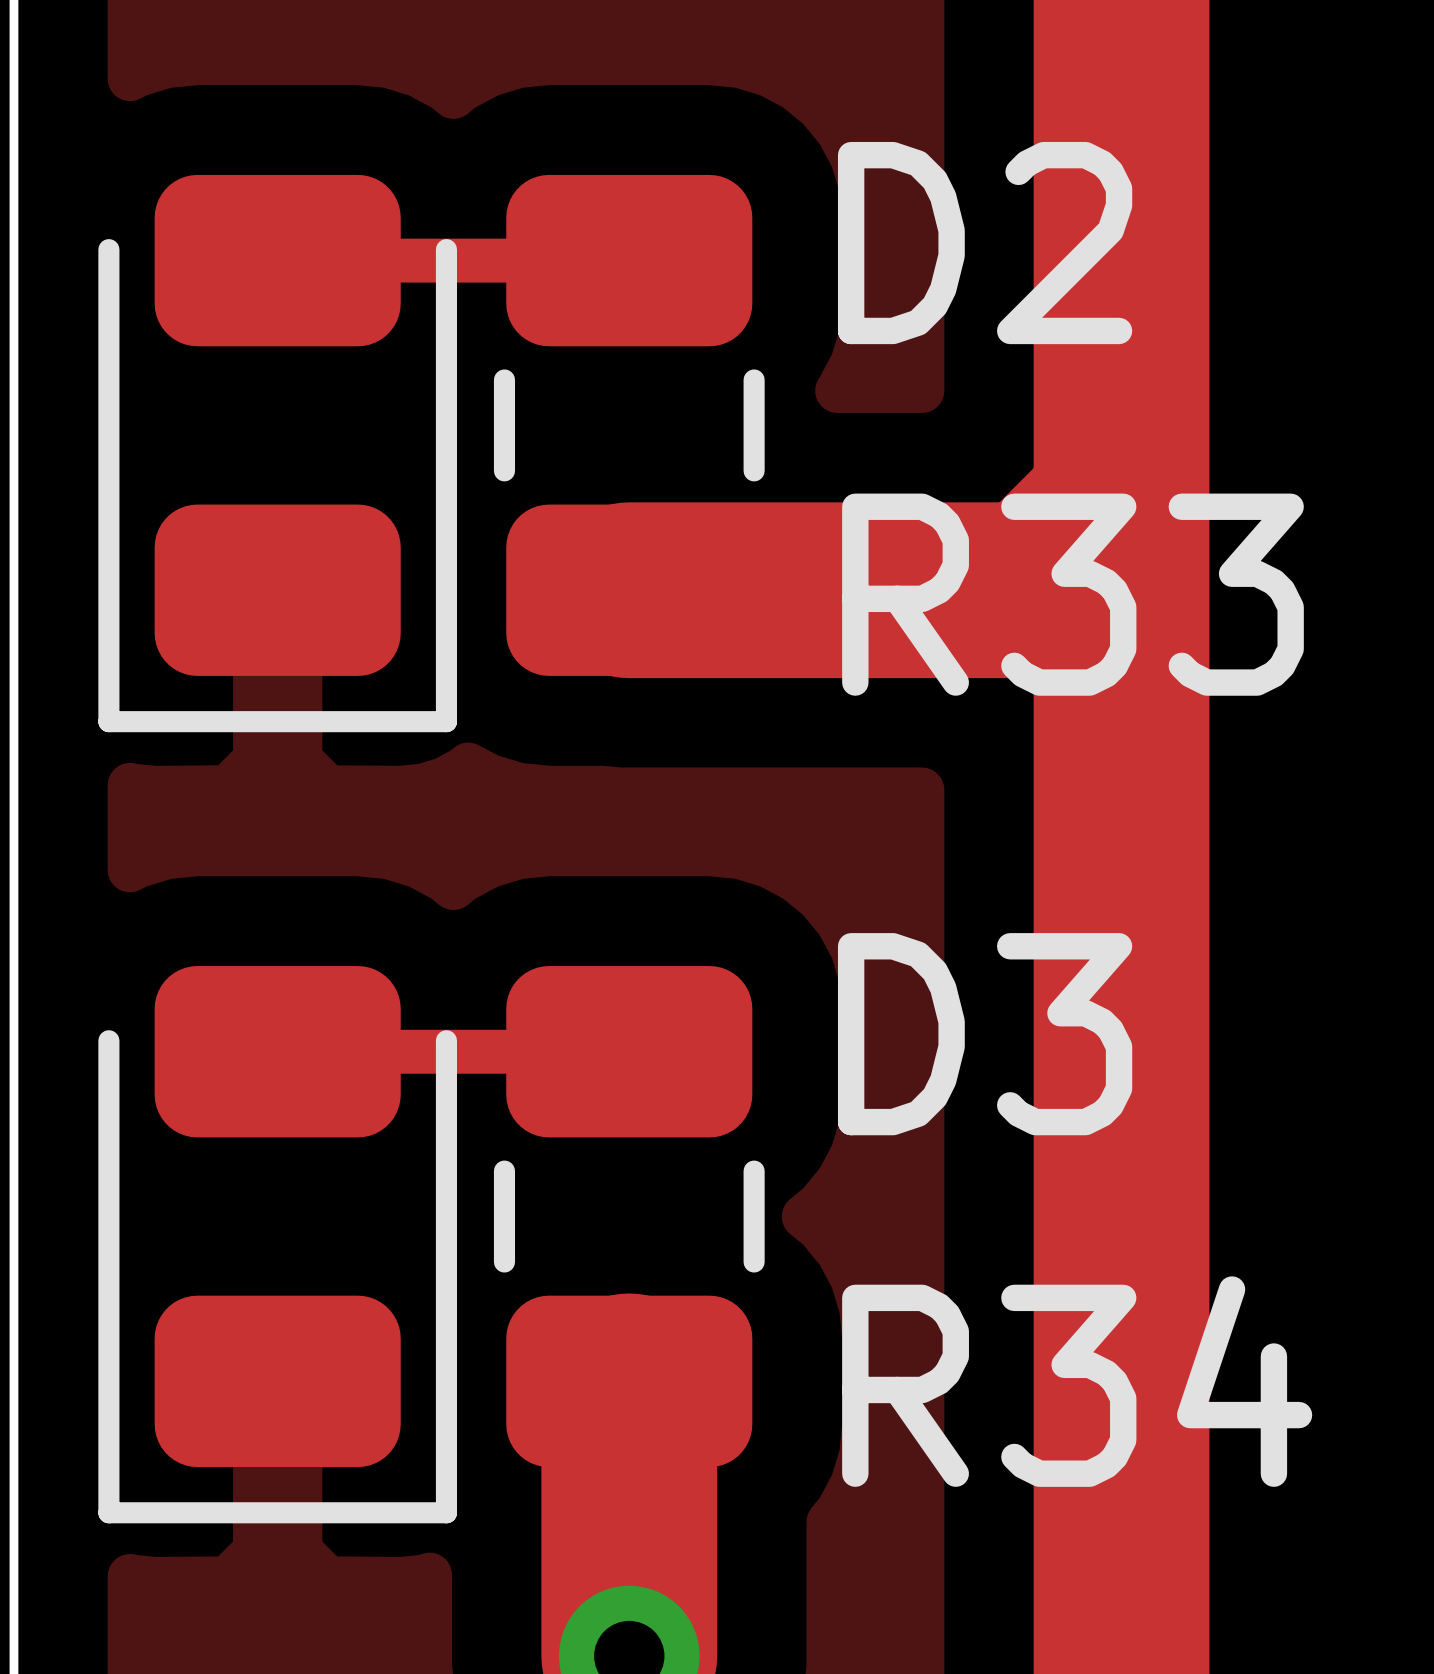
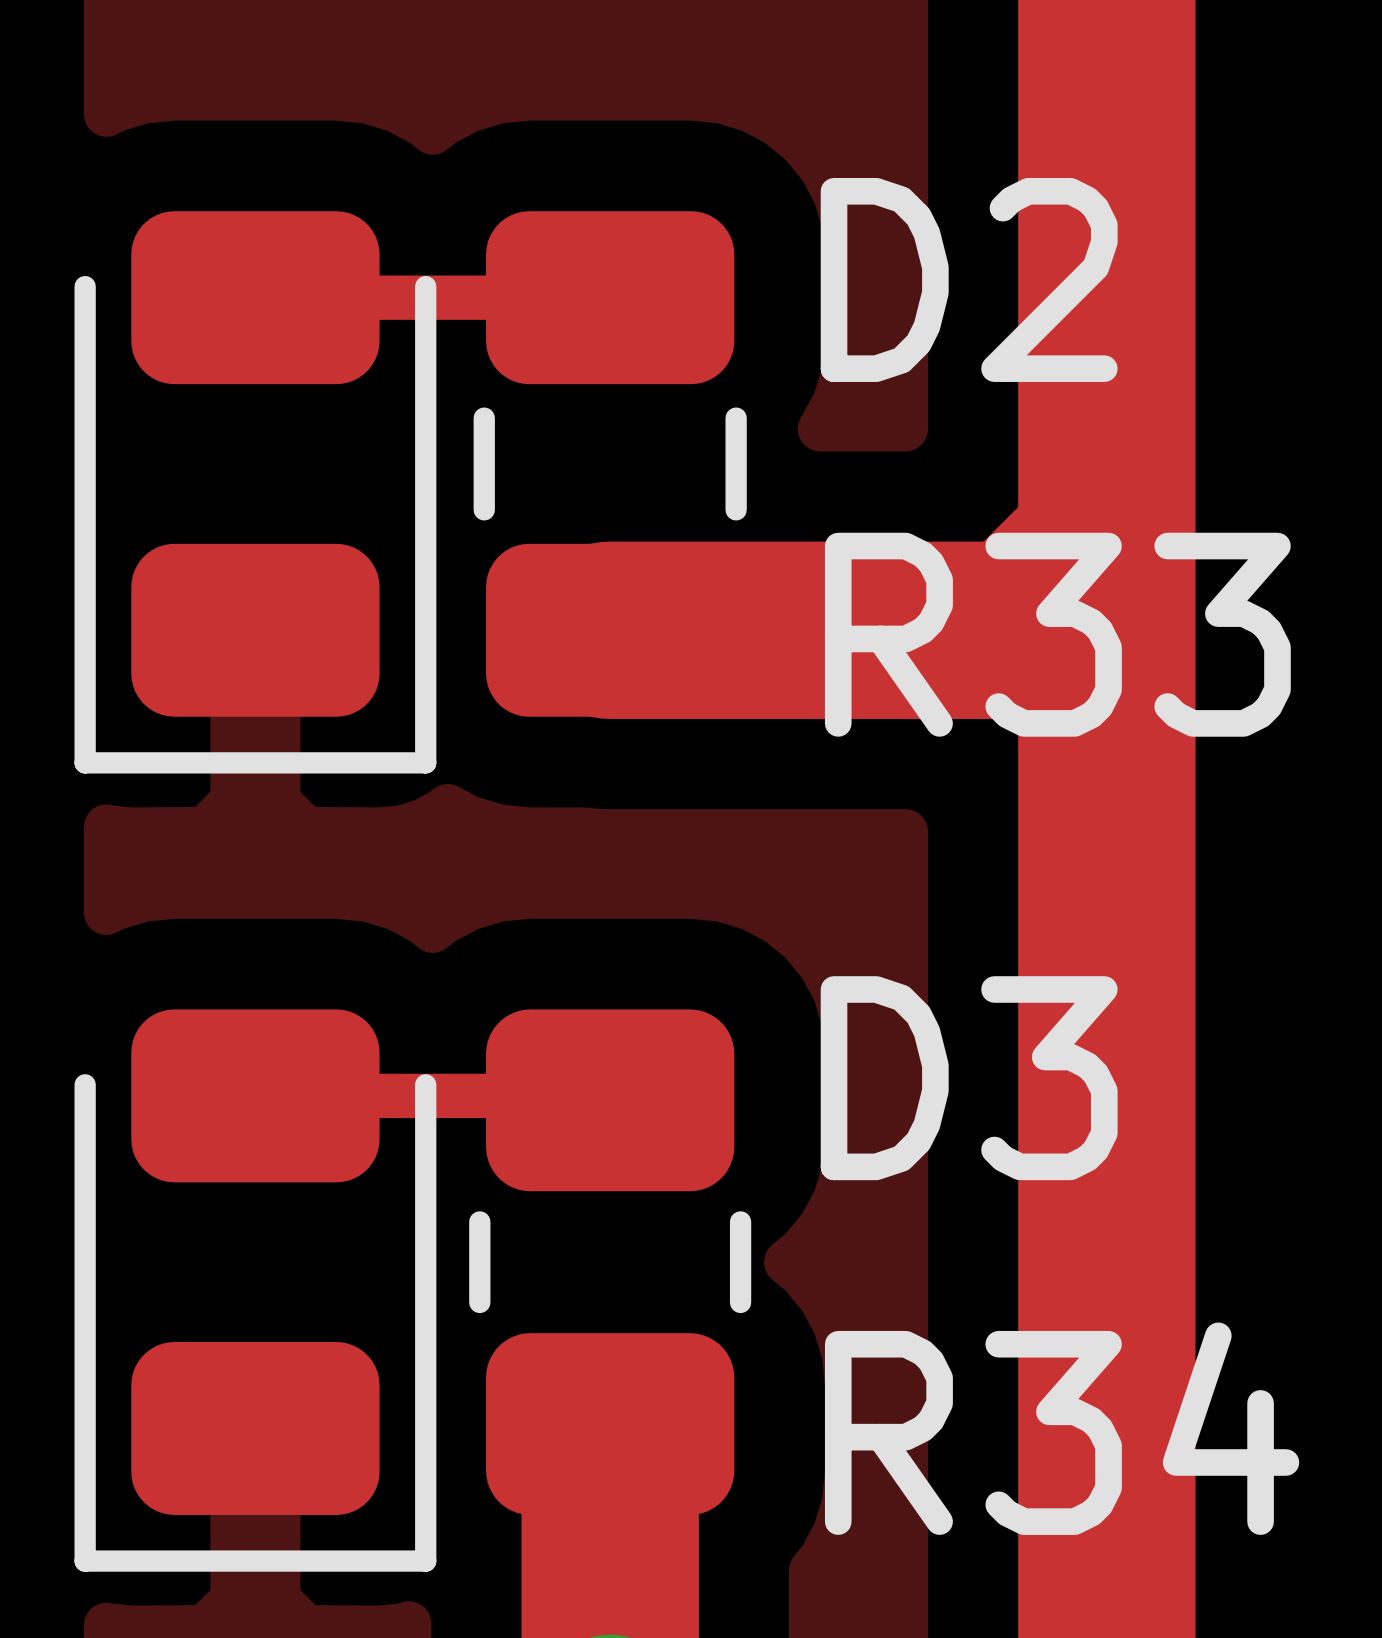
R34 footprint: [493, 966, 765, 1468] -> [469, 1009, 752, 1515]

